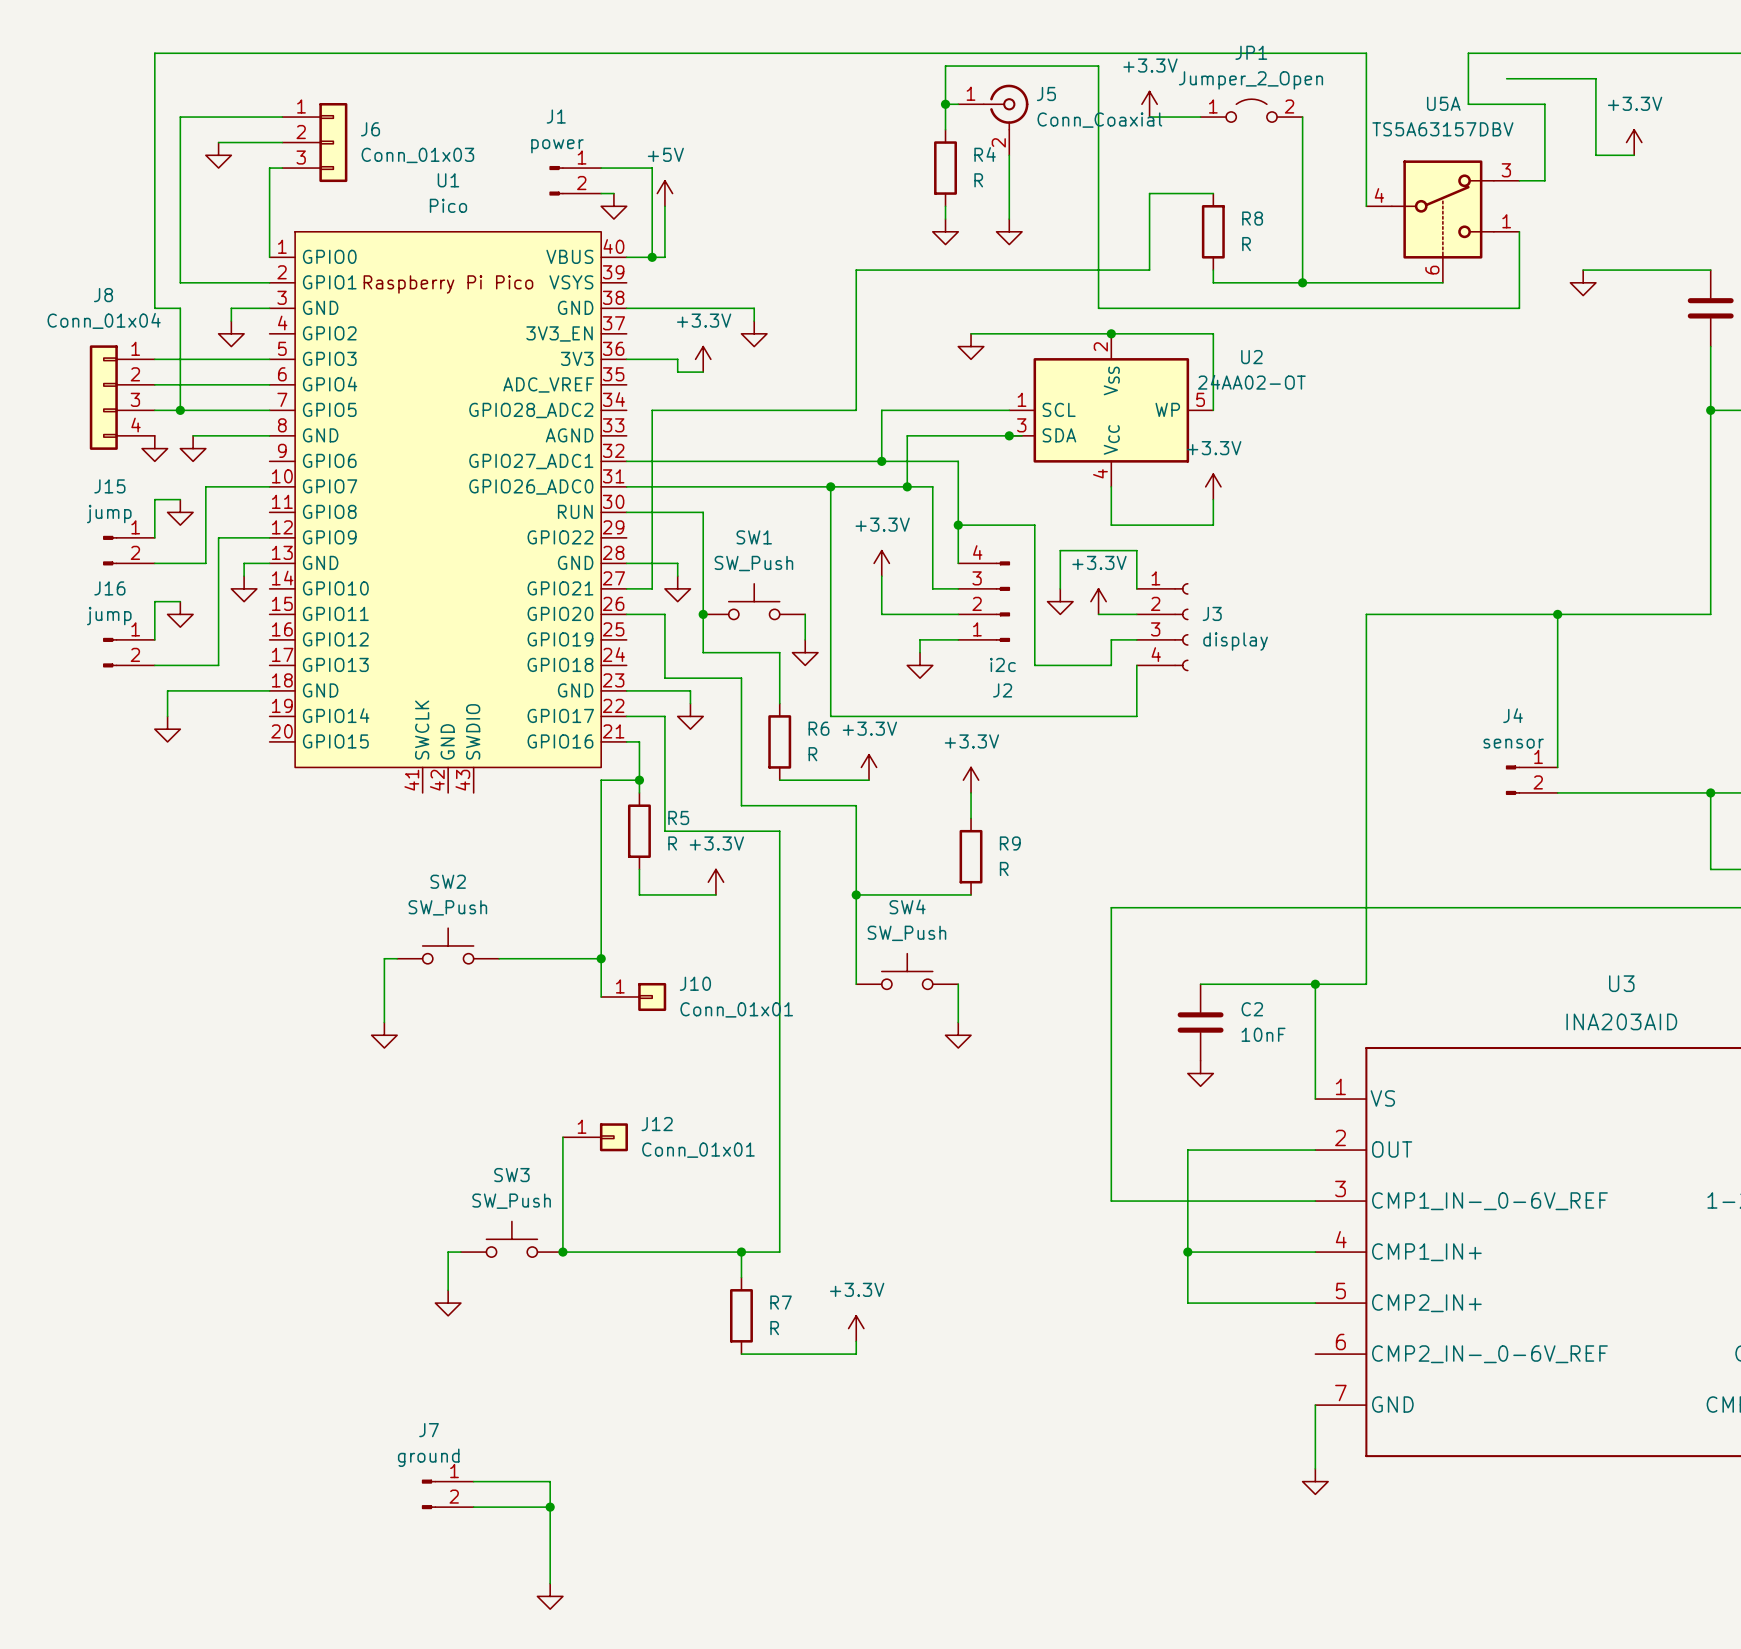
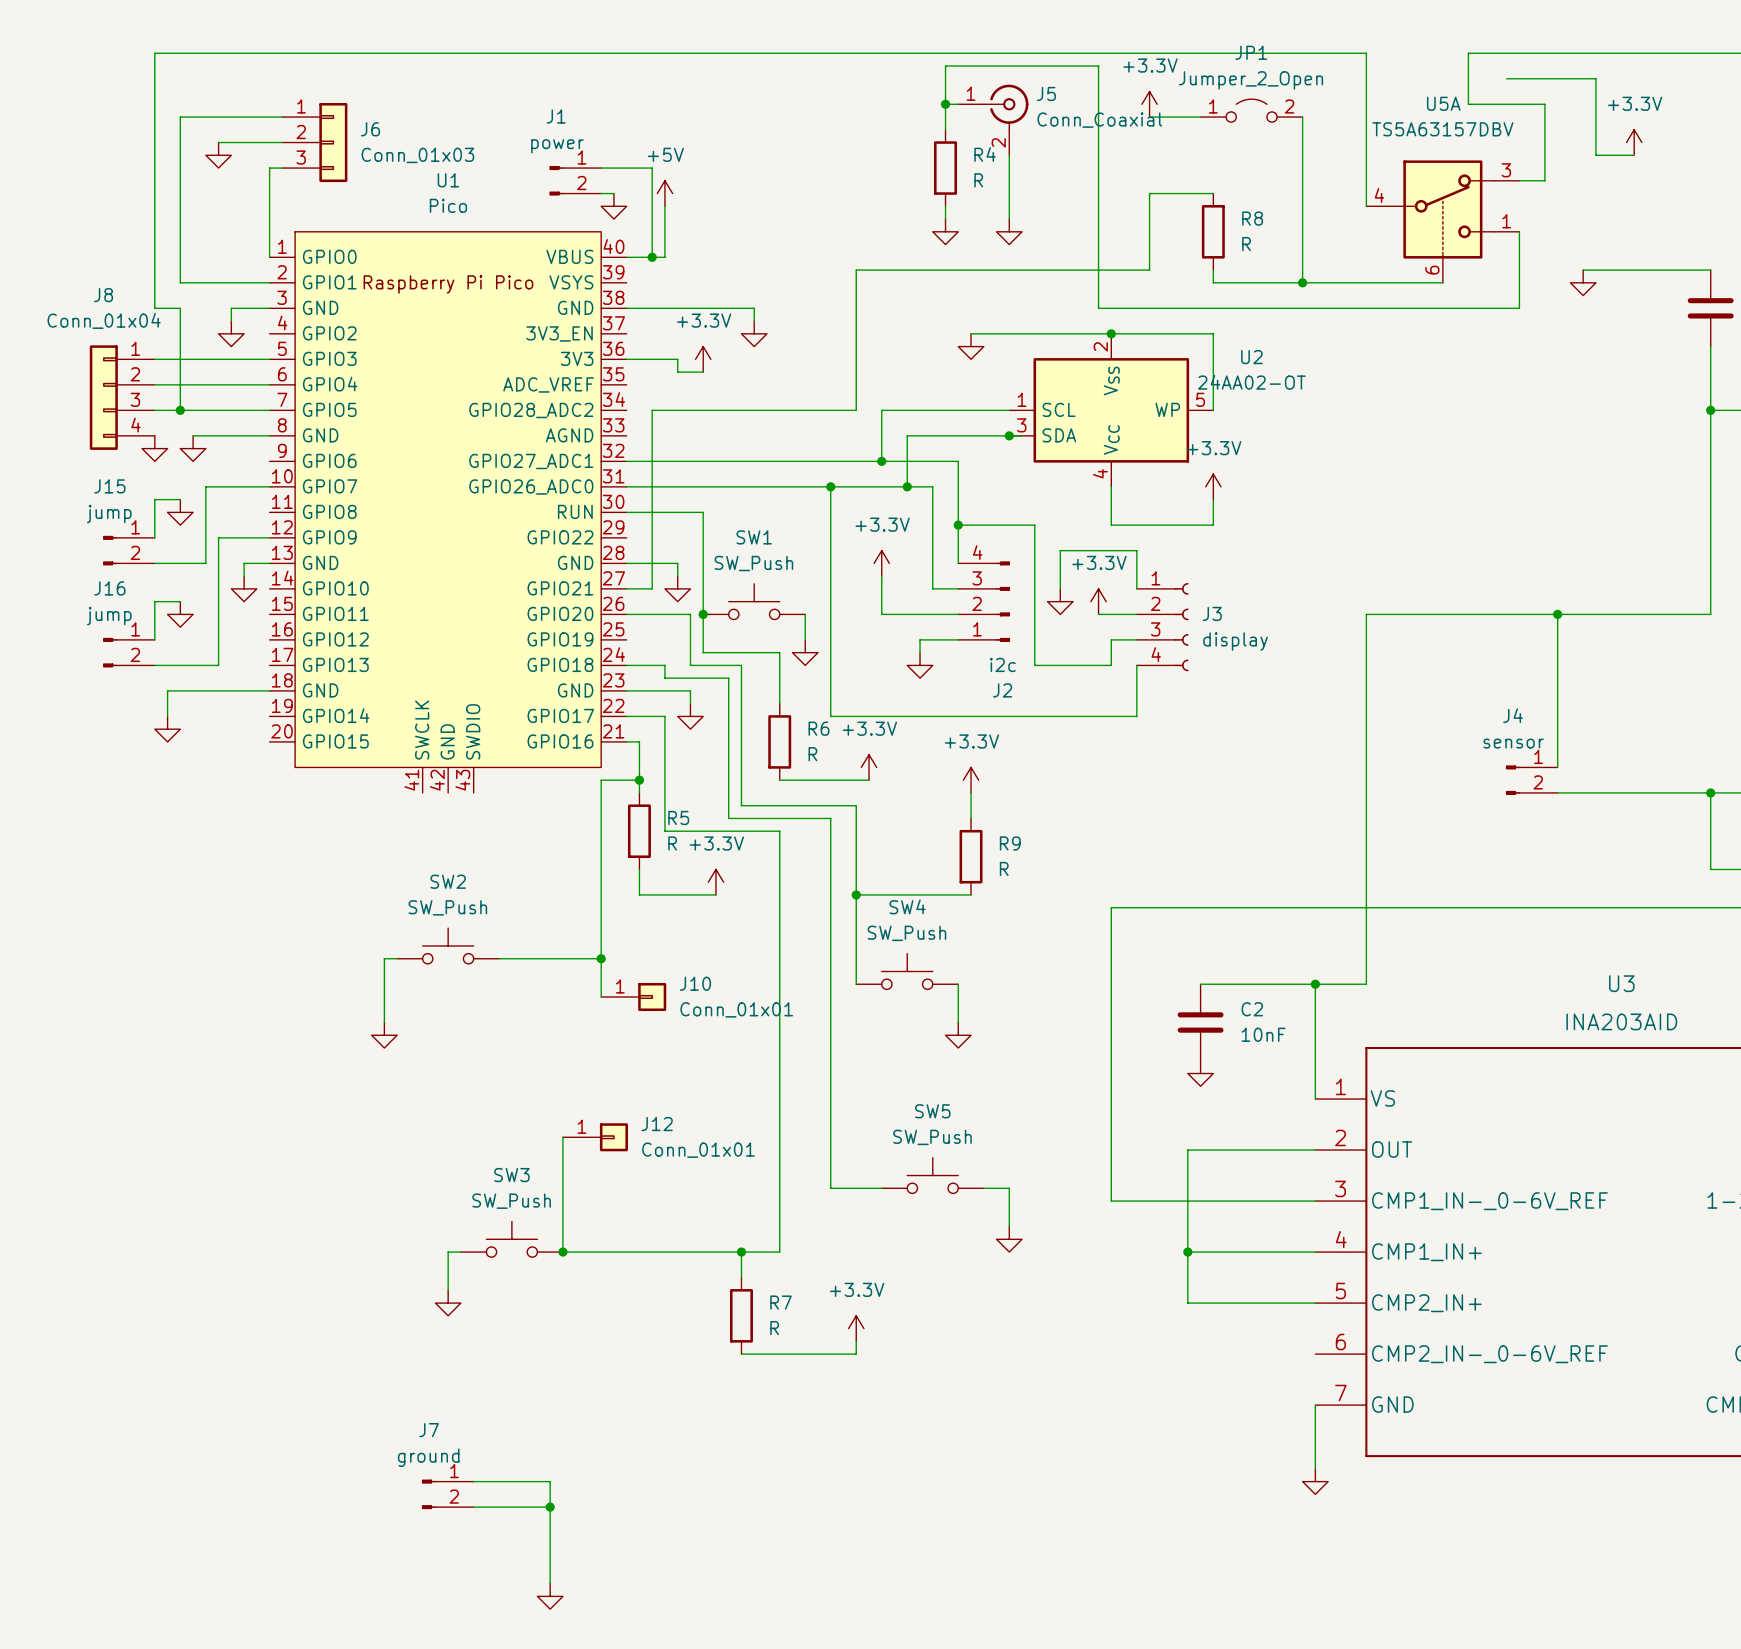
wire: (664, 614) (664, 665) -> (626, 665) (664, 665)
wire: (728, 678) (741, 678) -> (664, 614) (690, 614) (690, 665) (741, 665) (741, 678)
wire: none -> (728, 678) (728, 818) (830, 818) (830, 1188) (881, 1188)
SW5: none -> SW_Push (932, 1175)
wire: none -> (983, 1188) (1009, 1188) (1009, 1226)
power symbol: none -> (1009, 1239)

